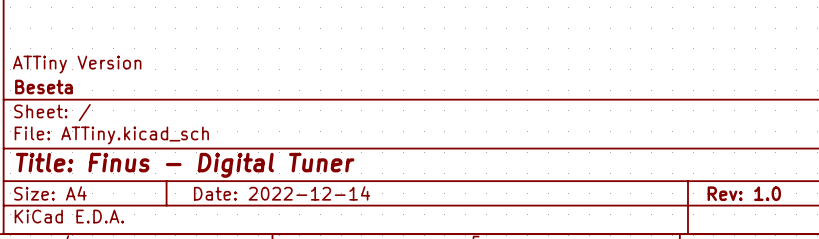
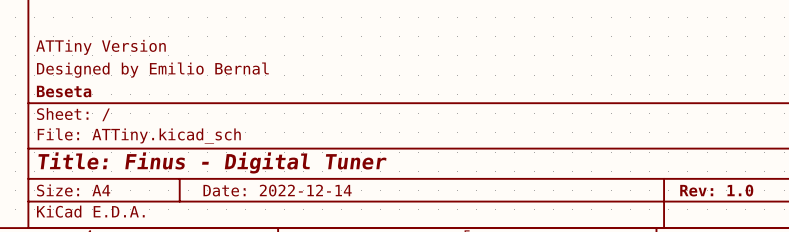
title block: none -> ATTiny Version (101, 47)
title block: ATTiny Version (77, 64) -> Designed by Emilio Bernal (152, 70)

